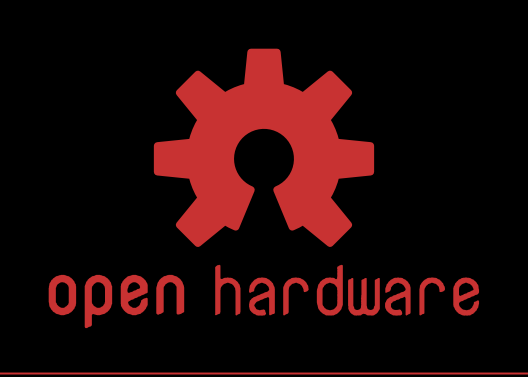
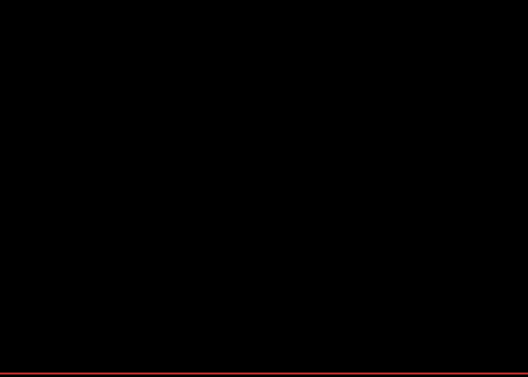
part: (263, 188) -> none

